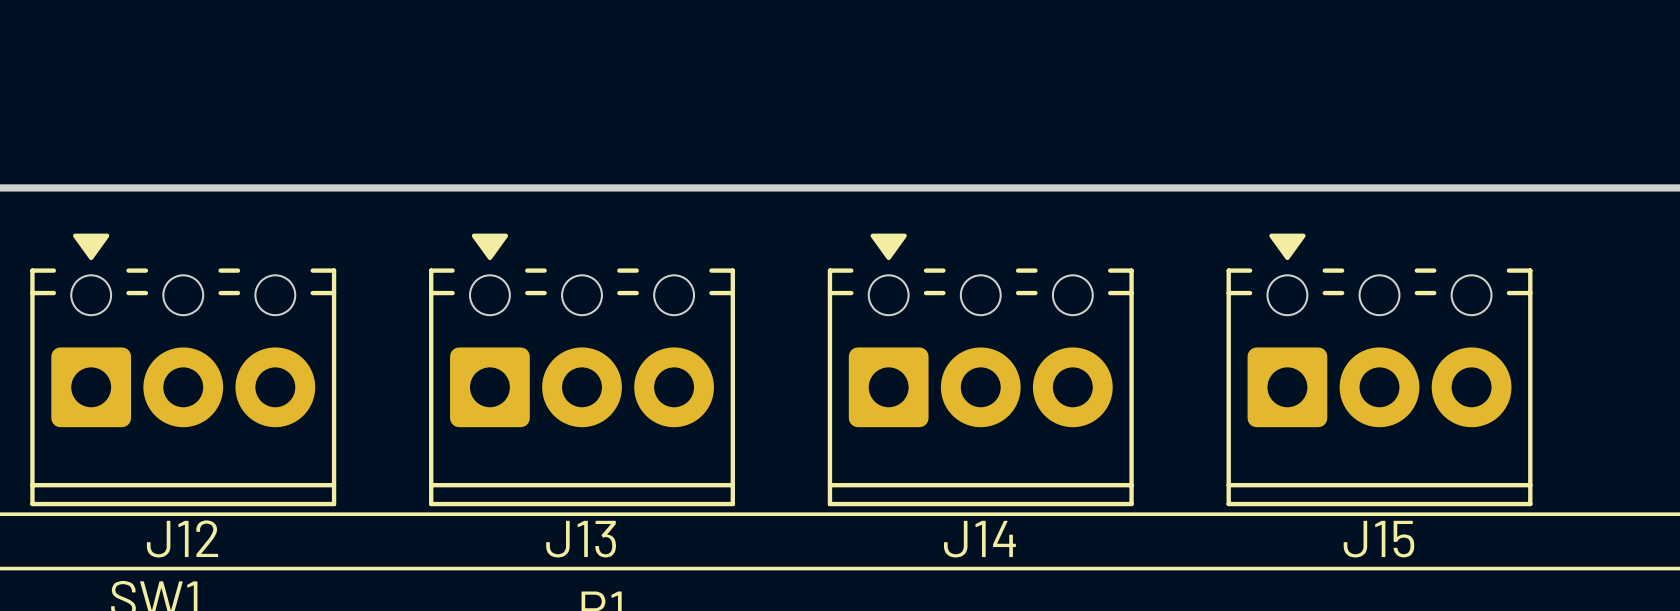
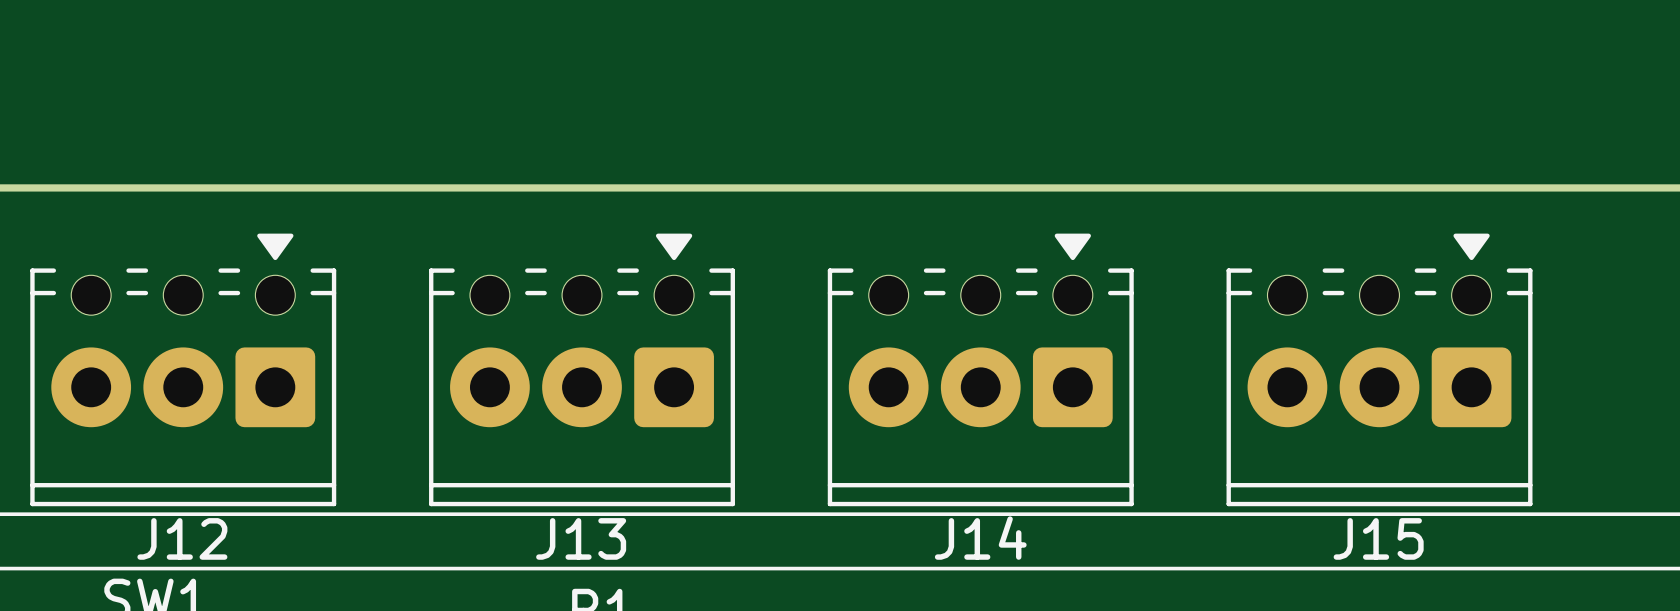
J12 footprint: [30, 233, 337, 507] -> [30, 233, 337, 507]
J13 footprint: [429, 233, 735, 507] -> [429, 233, 735, 507]
J14 footprint: [827, 233, 1134, 507] -> [827, 233, 1134, 507]
J15 footprint: [1226, 233, 1533, 507] -> [1226, 233, 1533, 507]

